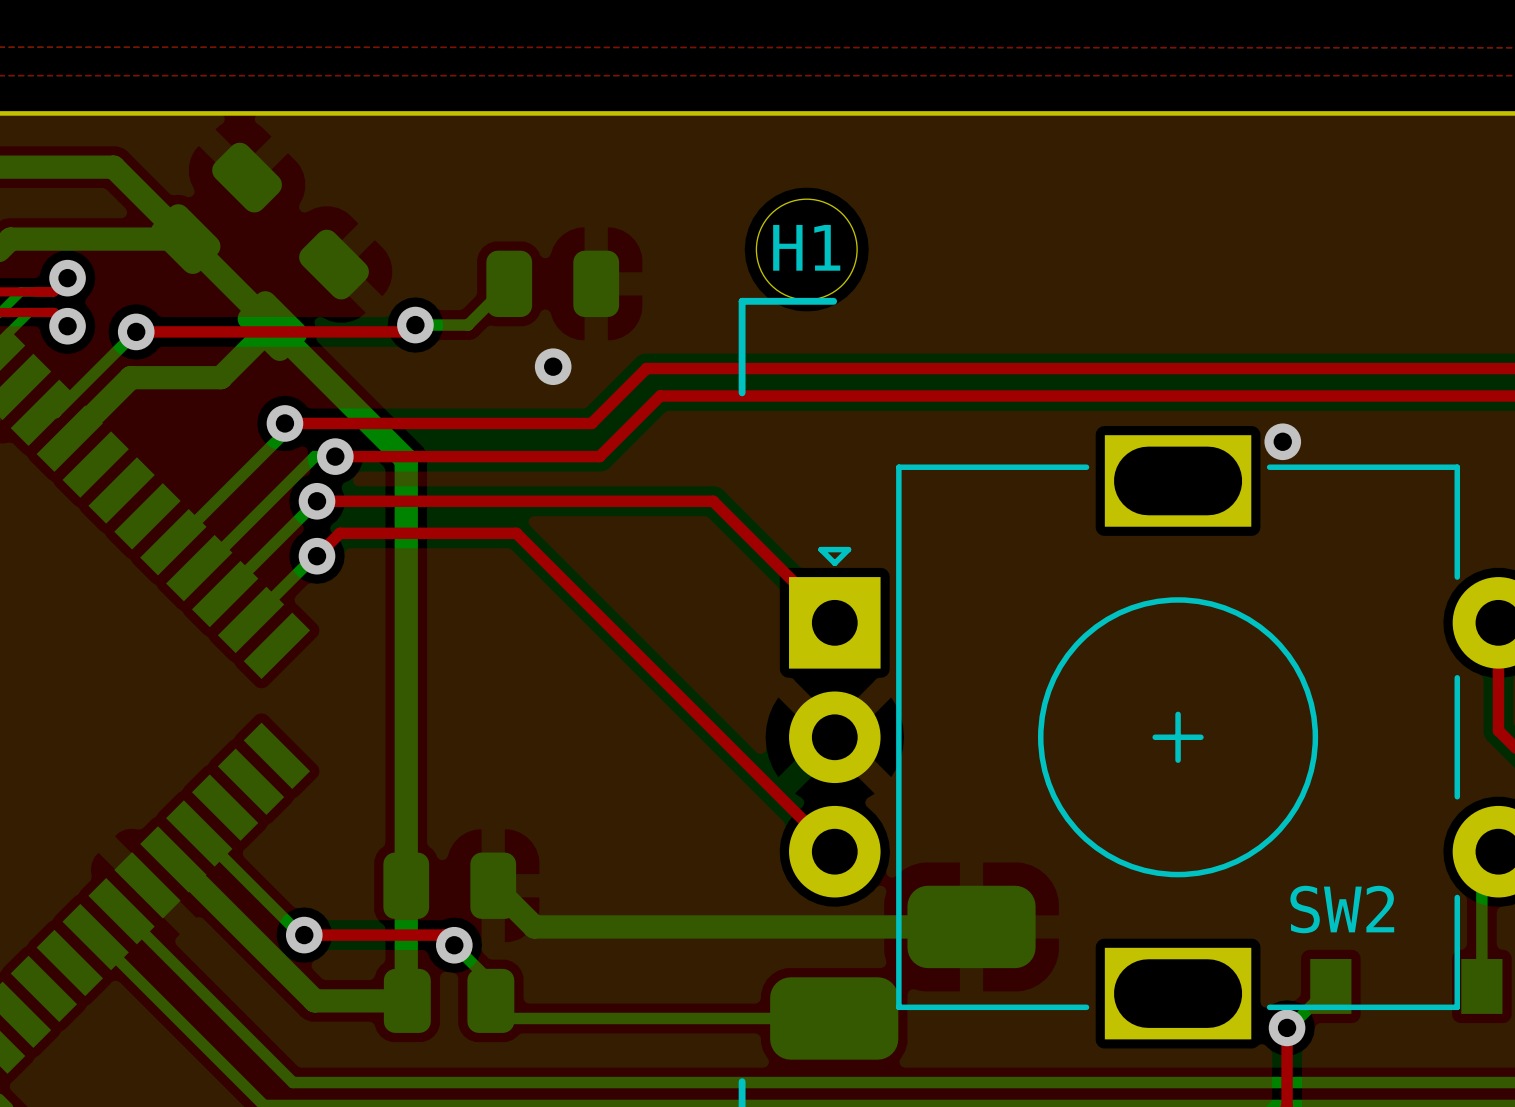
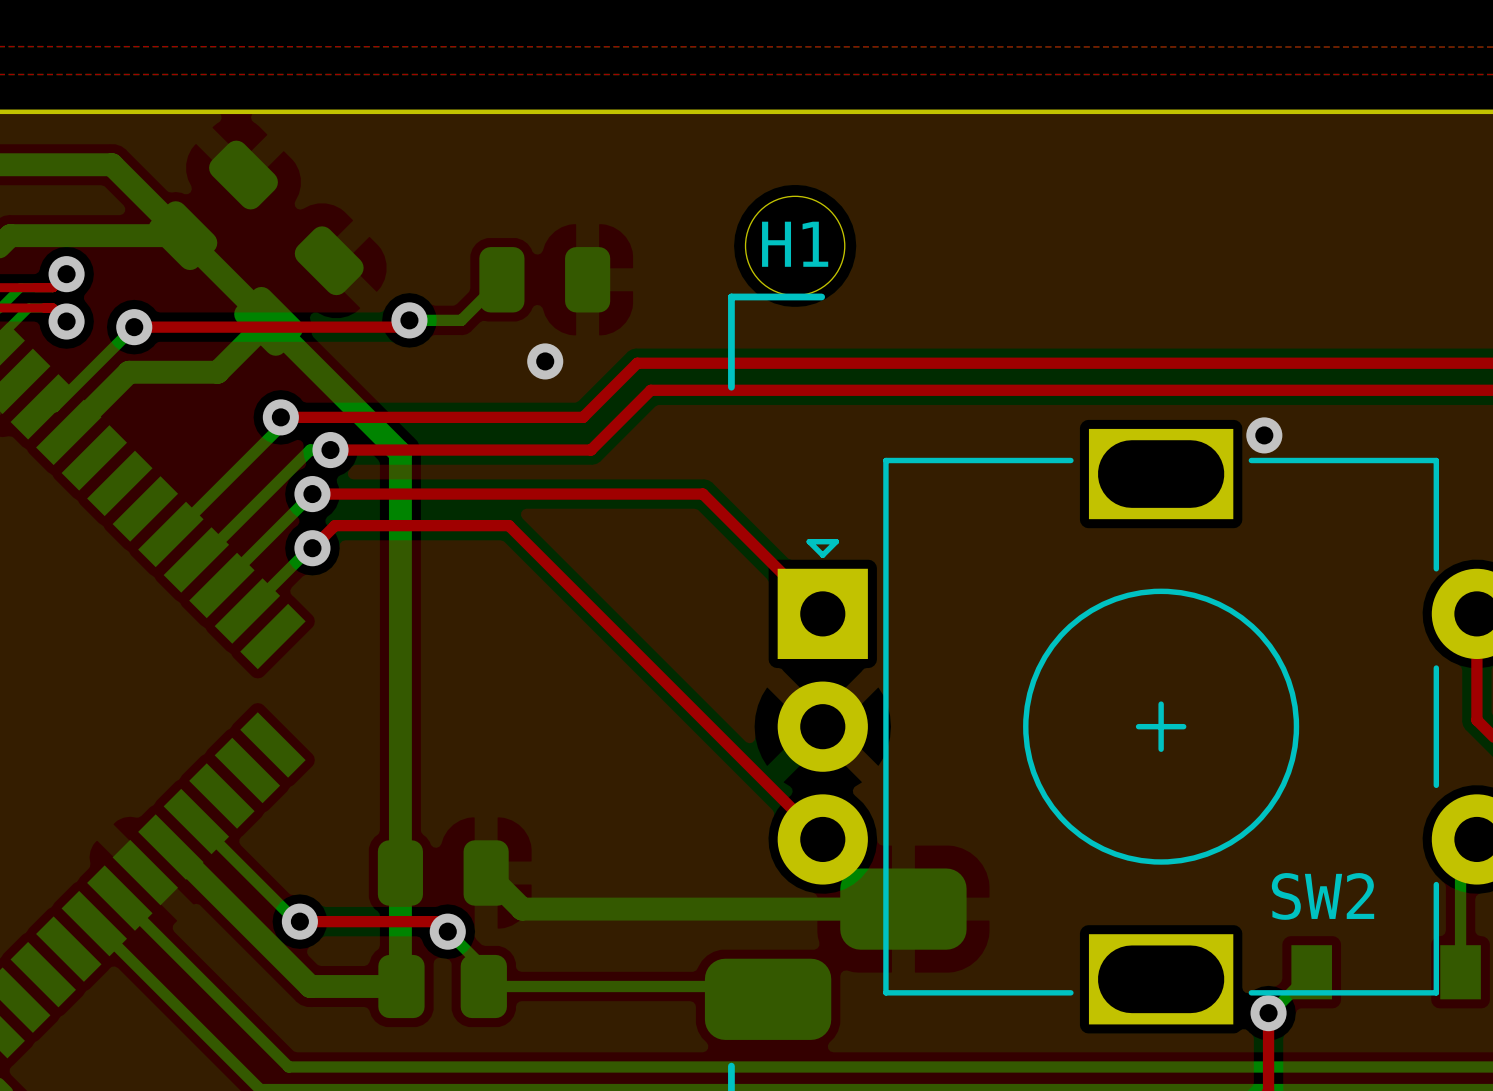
bottom track: (529, 922) (534, 926) (971, 926) -> (522, 909) (903, 909)
part position: (902, 972) -> (835, 954)
bottom track: (490, 1000) (508, 1018) (834, 1018) -> (483, 986) (755, 986) (768, 999)

